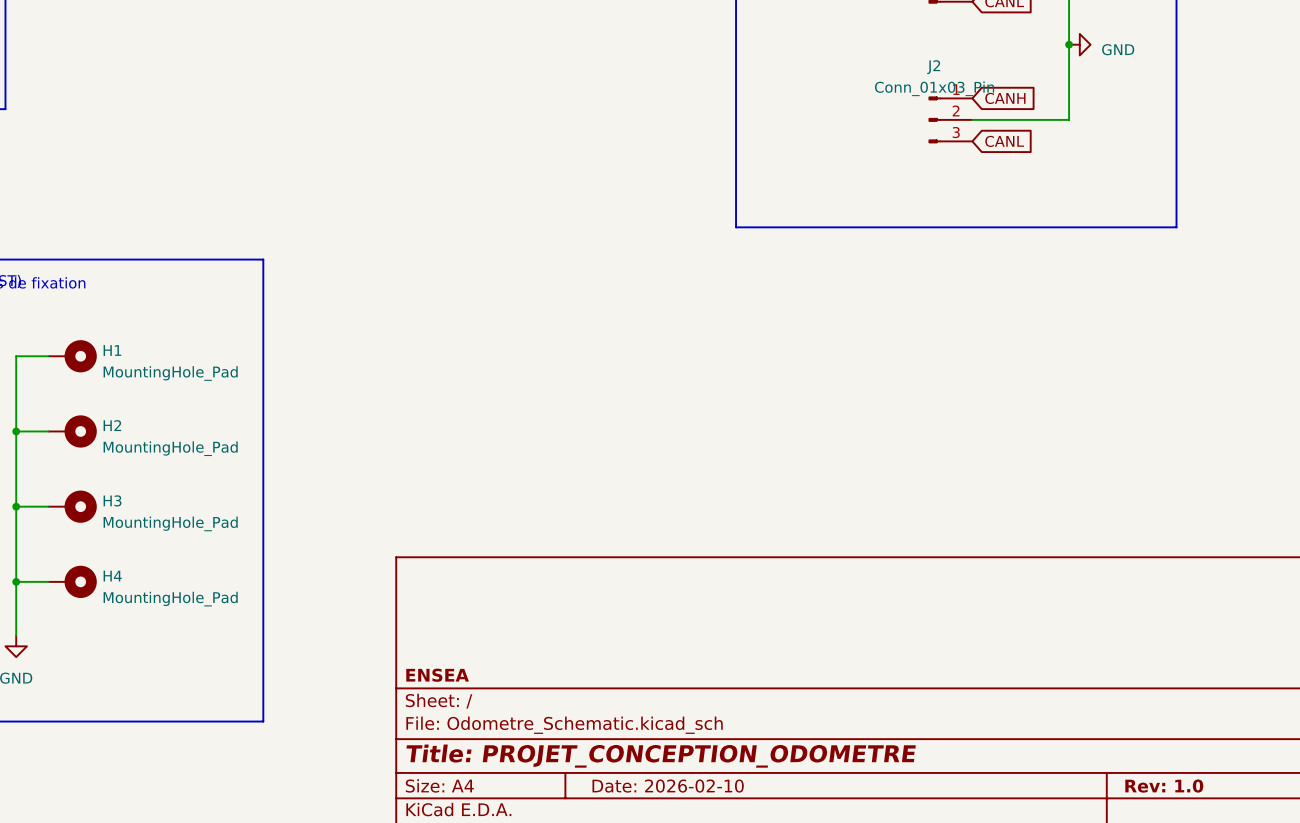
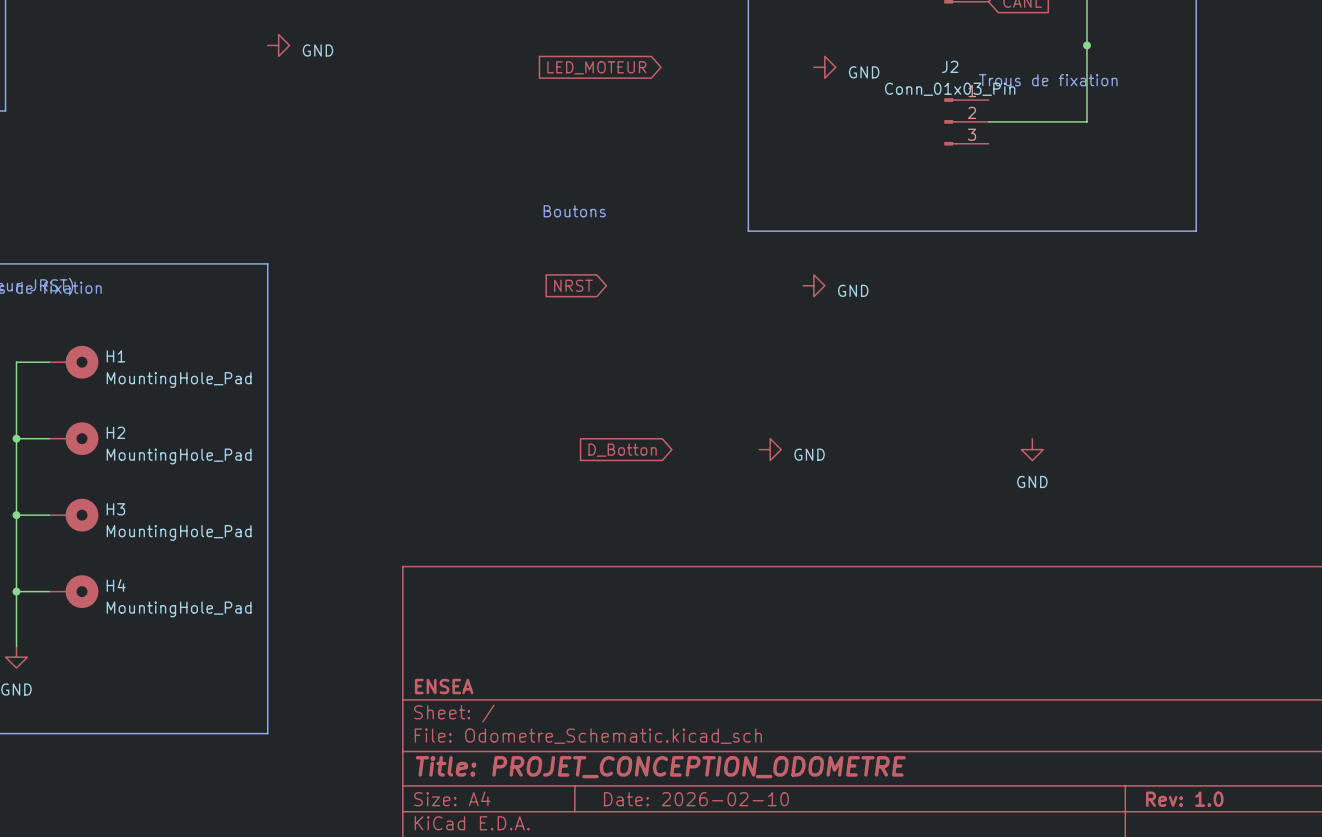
power symbol: none -> GND (278, 45)
power symbol: GND (1079, 44) -> none
power symbol: none -> GND (824, 67)
global label: none -> LED_MOTEUR (596, 67)
text: none -> Trous de fixation (1048, 80)
global label: CANH (1005, 98) -> none
global label: CANL (1004, 141) -> none
text: none -> Boutons (574, 211)
global label: none -> NRST (573, 285)
power symbol: none -> GND (813, 285)
power symbol: none -> GND (770, 449)
power symbol: none -> GND (1032, 449)
global label: none -> D_Botton (622, 450)

